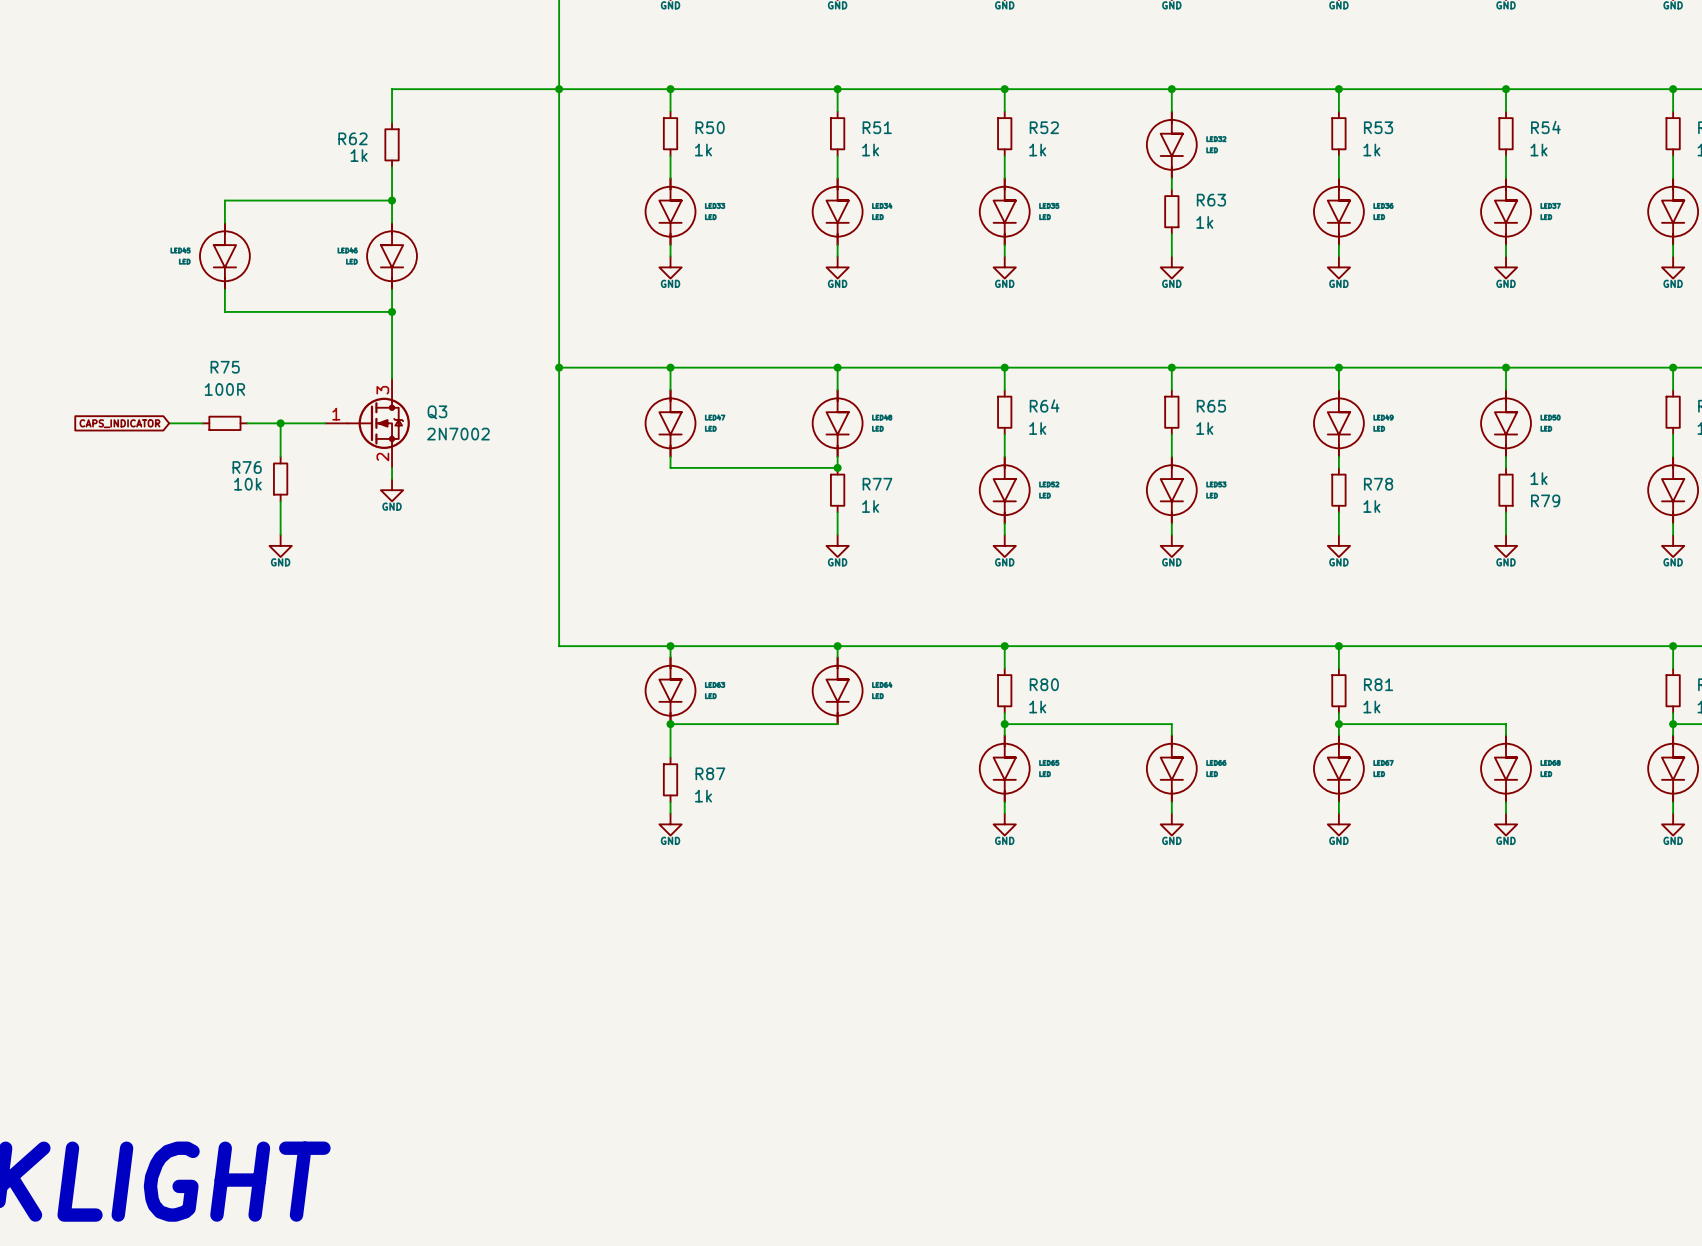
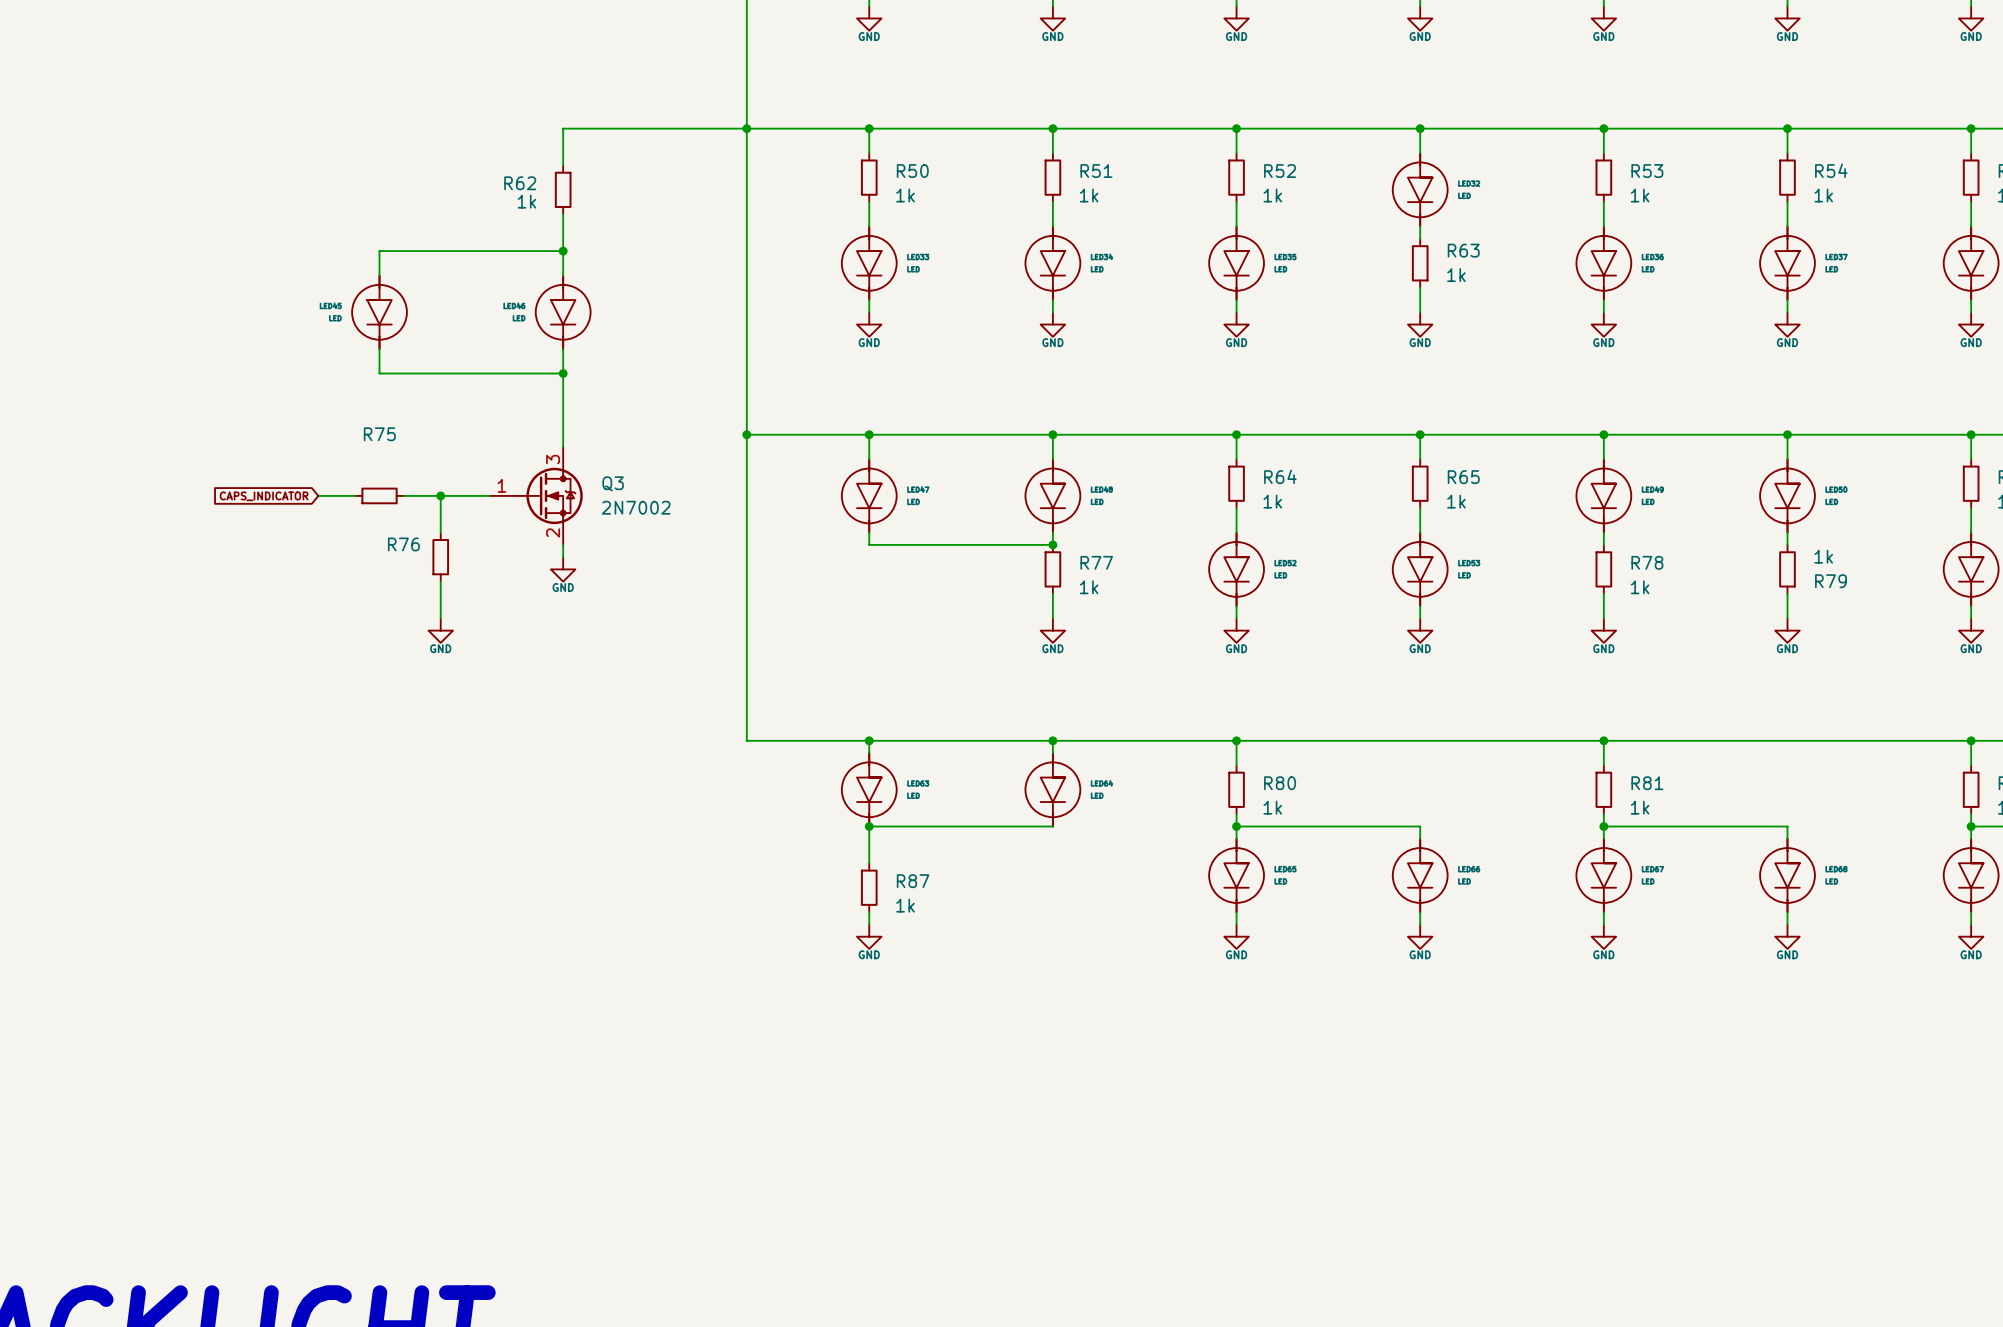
R75 value: 100R (224, 389) -> none
R76 value: 10k (247, 484) -> none

